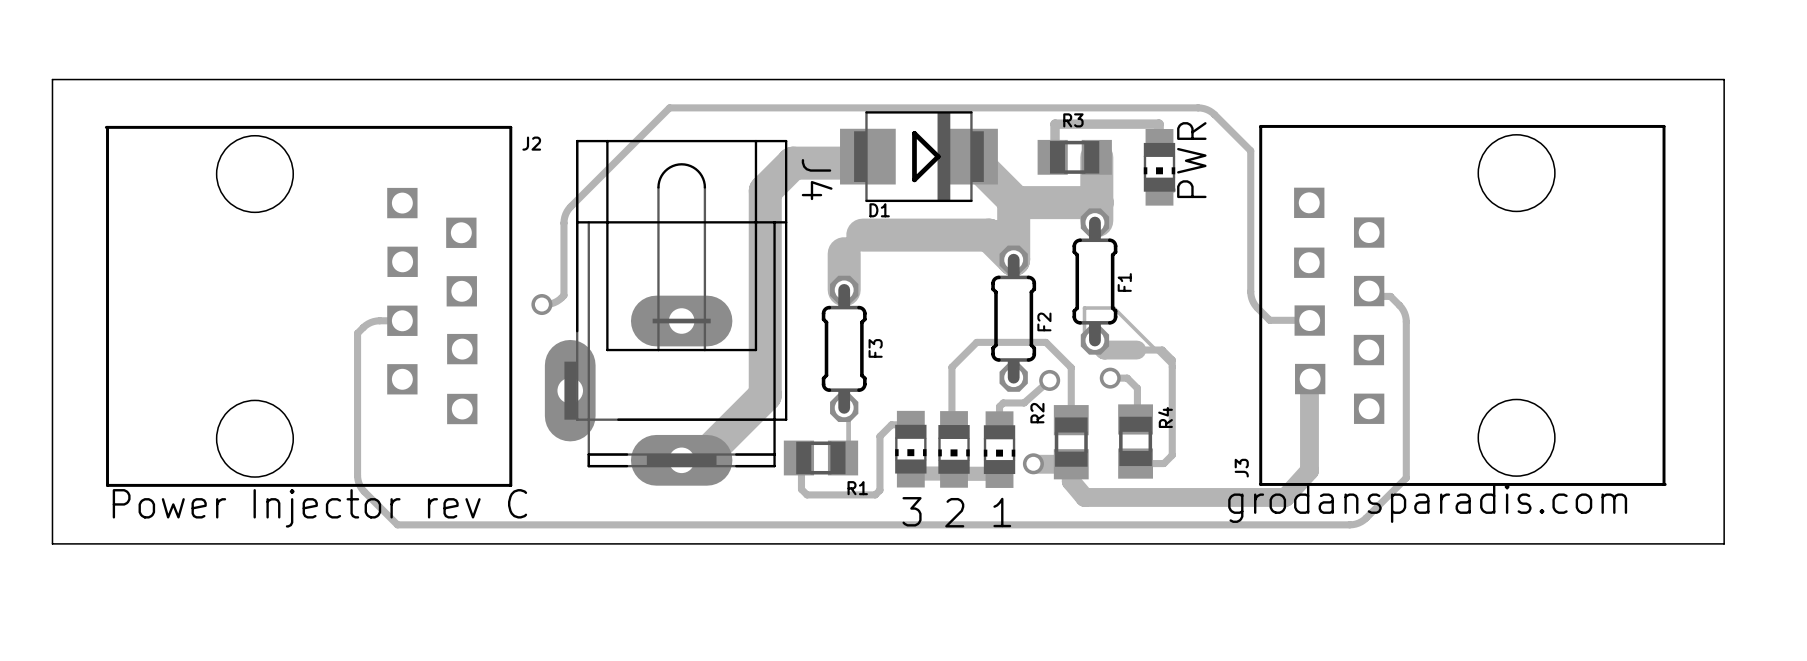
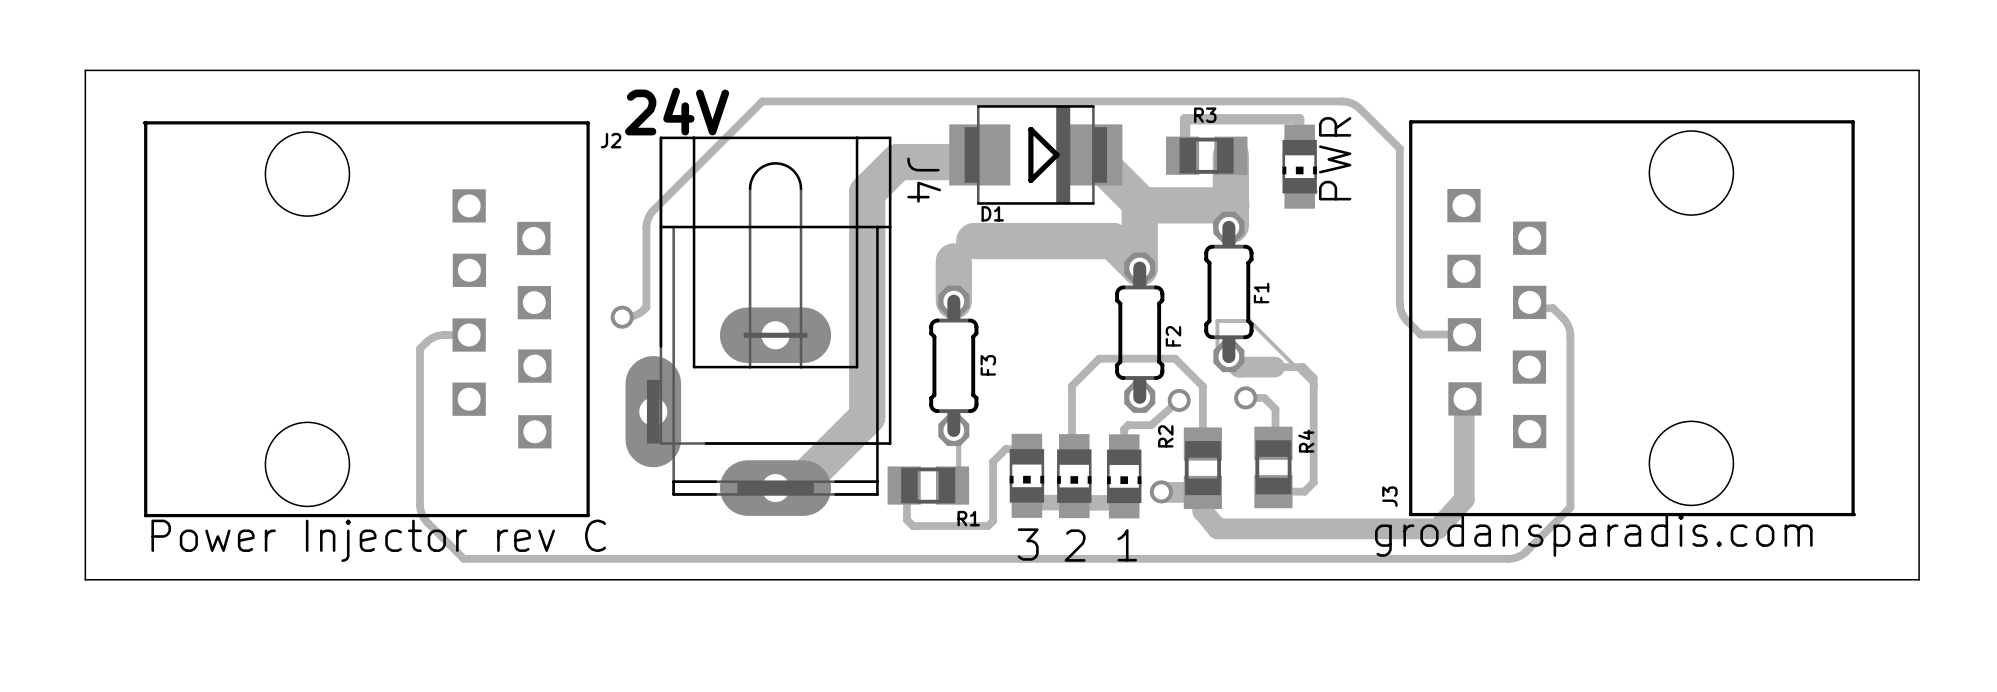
text: none -> 24V (677, 111)

